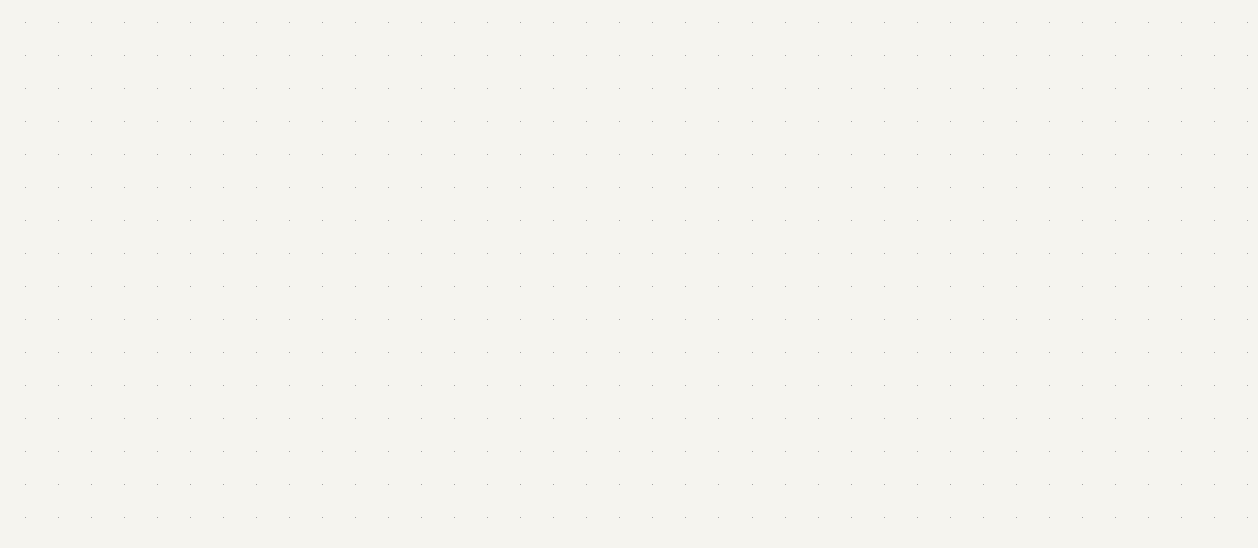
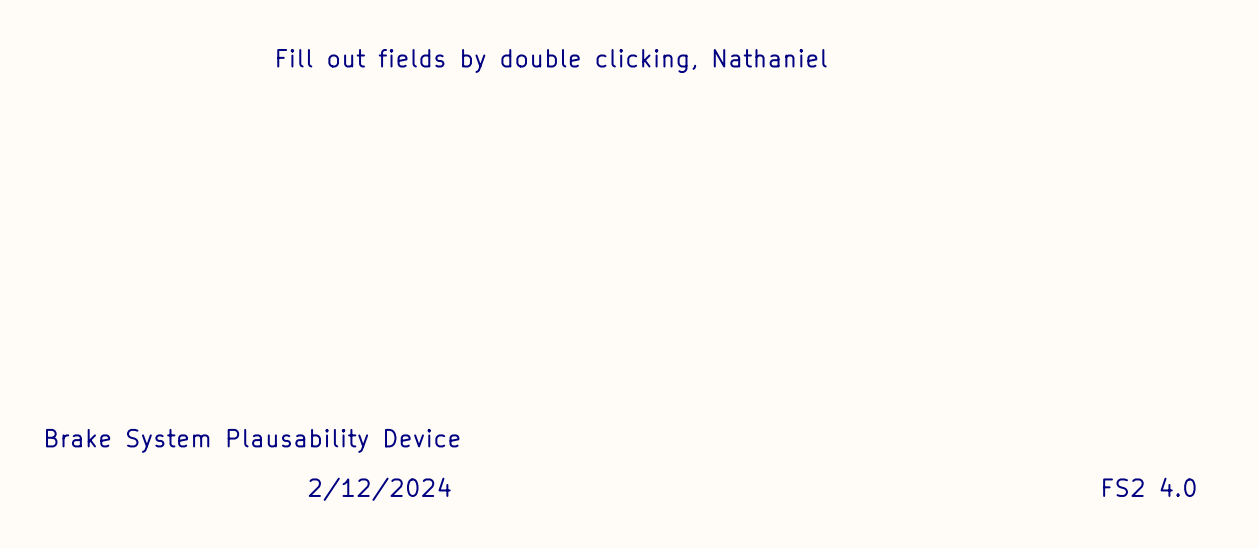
text: none -> Fill out fields by double clicking, Nathaniel (551, 60)
text: none -> Brake System Plausability Device (252, 440)
text: none -> FS2 4.0 (1149, 487)
text: none -> 2/12/2024 (379, 489)

